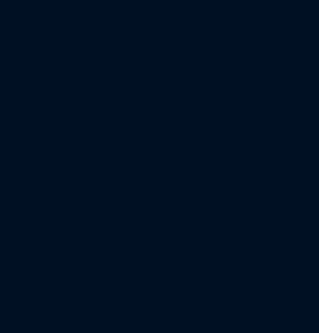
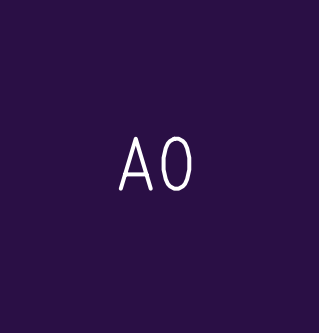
text: none -> A0 (155, 163)

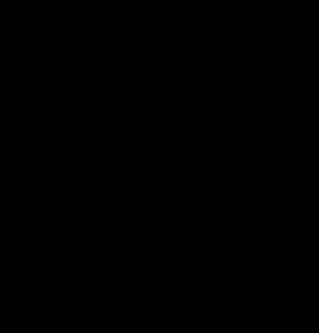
text: A0 (155, 163) -> none

